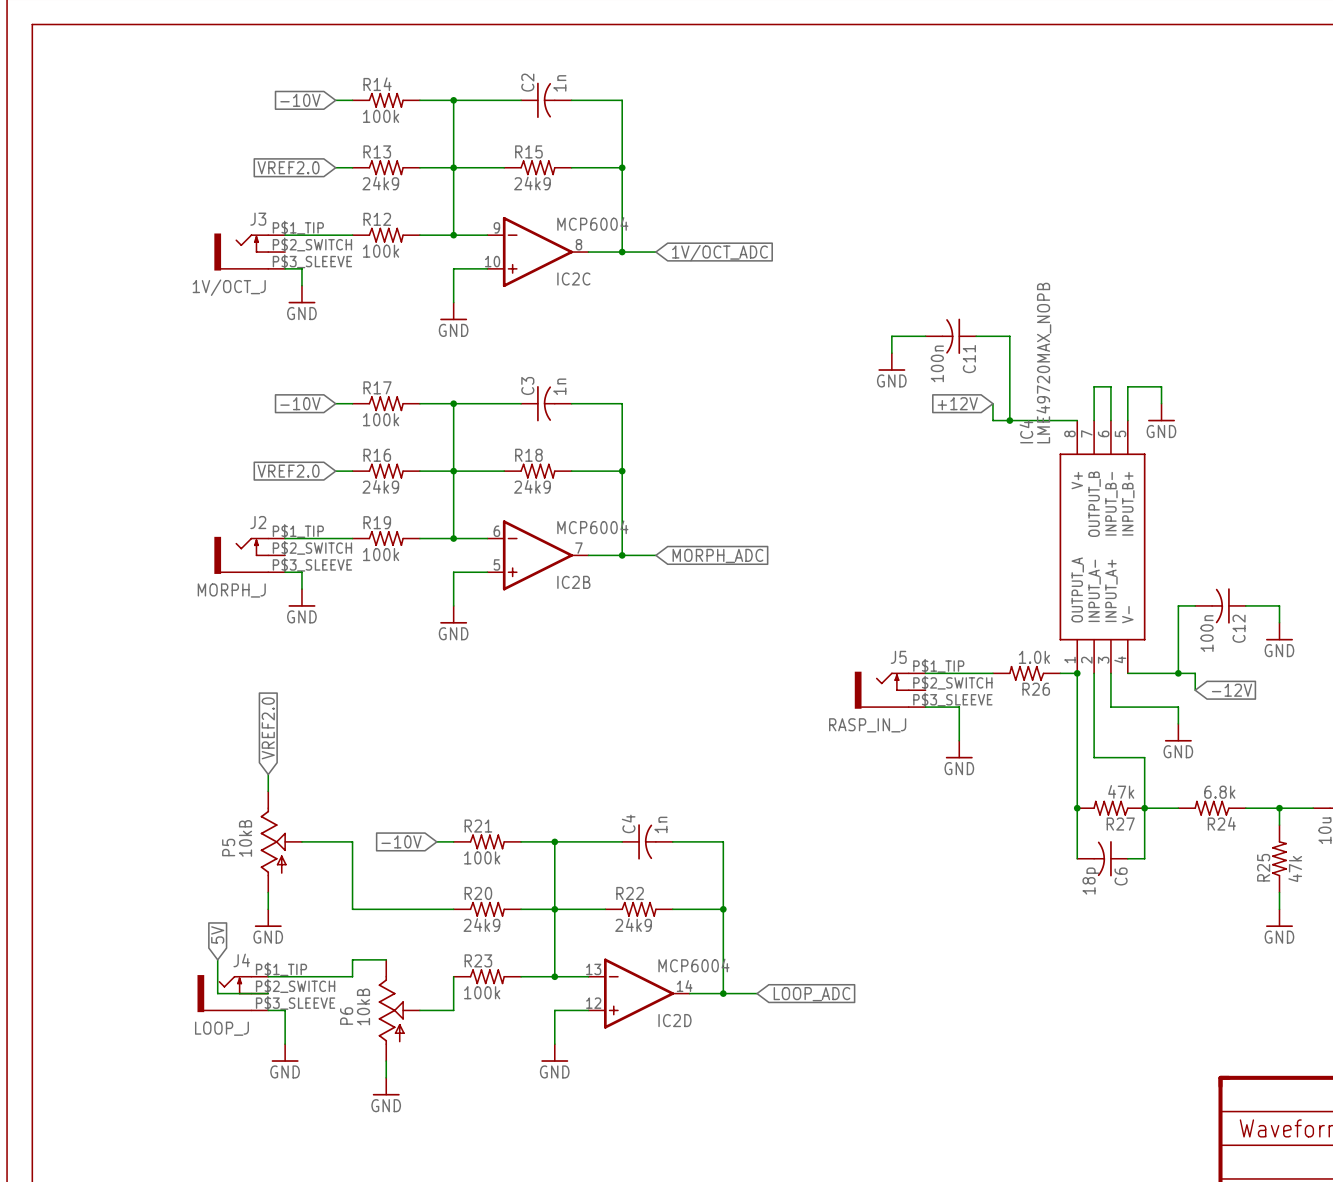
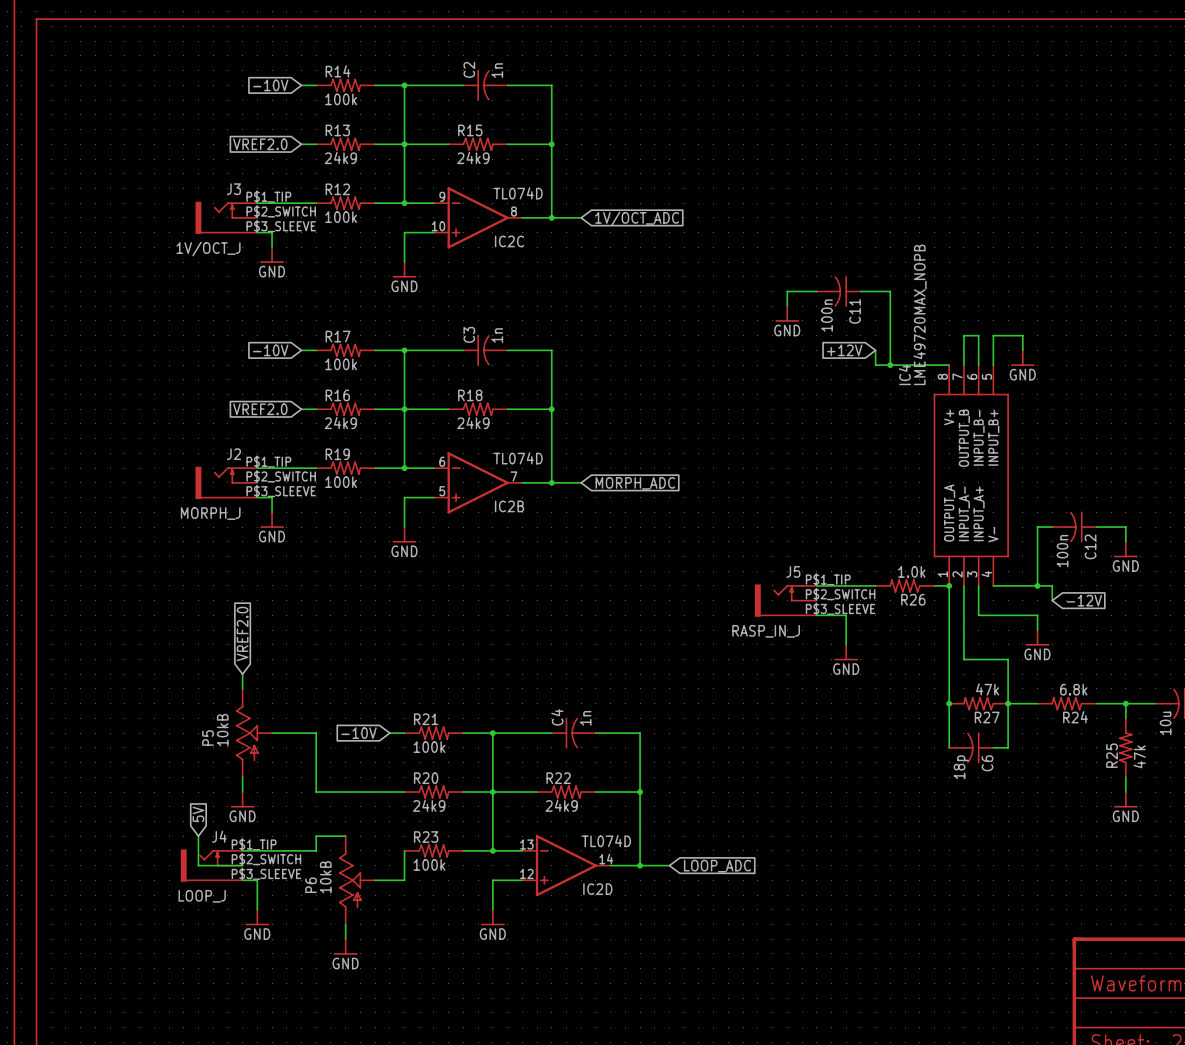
IC2C value: MCP6004 (592, 223) -> TL074D (518, 193)
IC2B value: MCP6004 (592, 527) -> TL074D (518, 458)
IC2D value: MCP6004 (693, 965) -> TL074D (606, 841)

